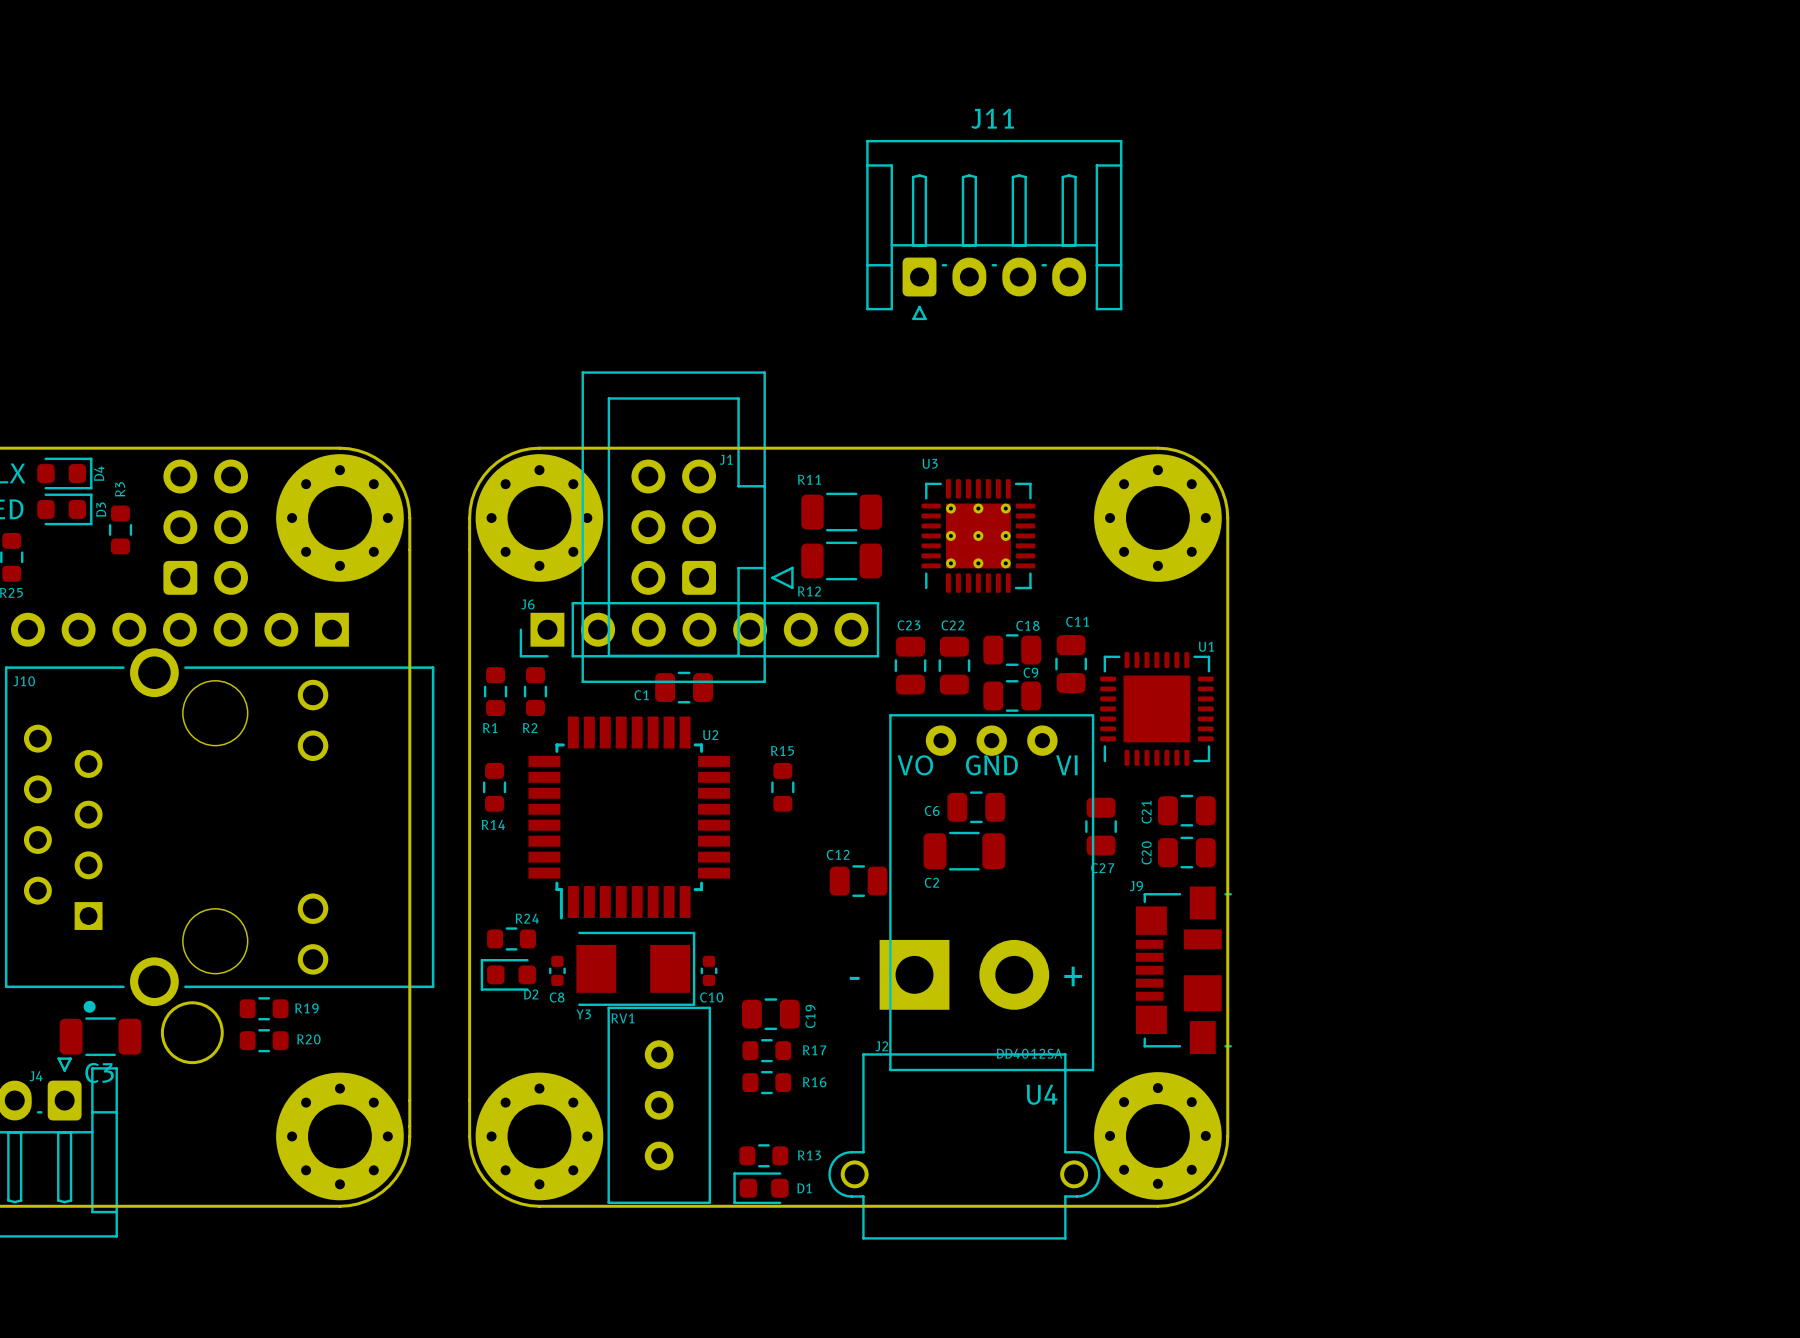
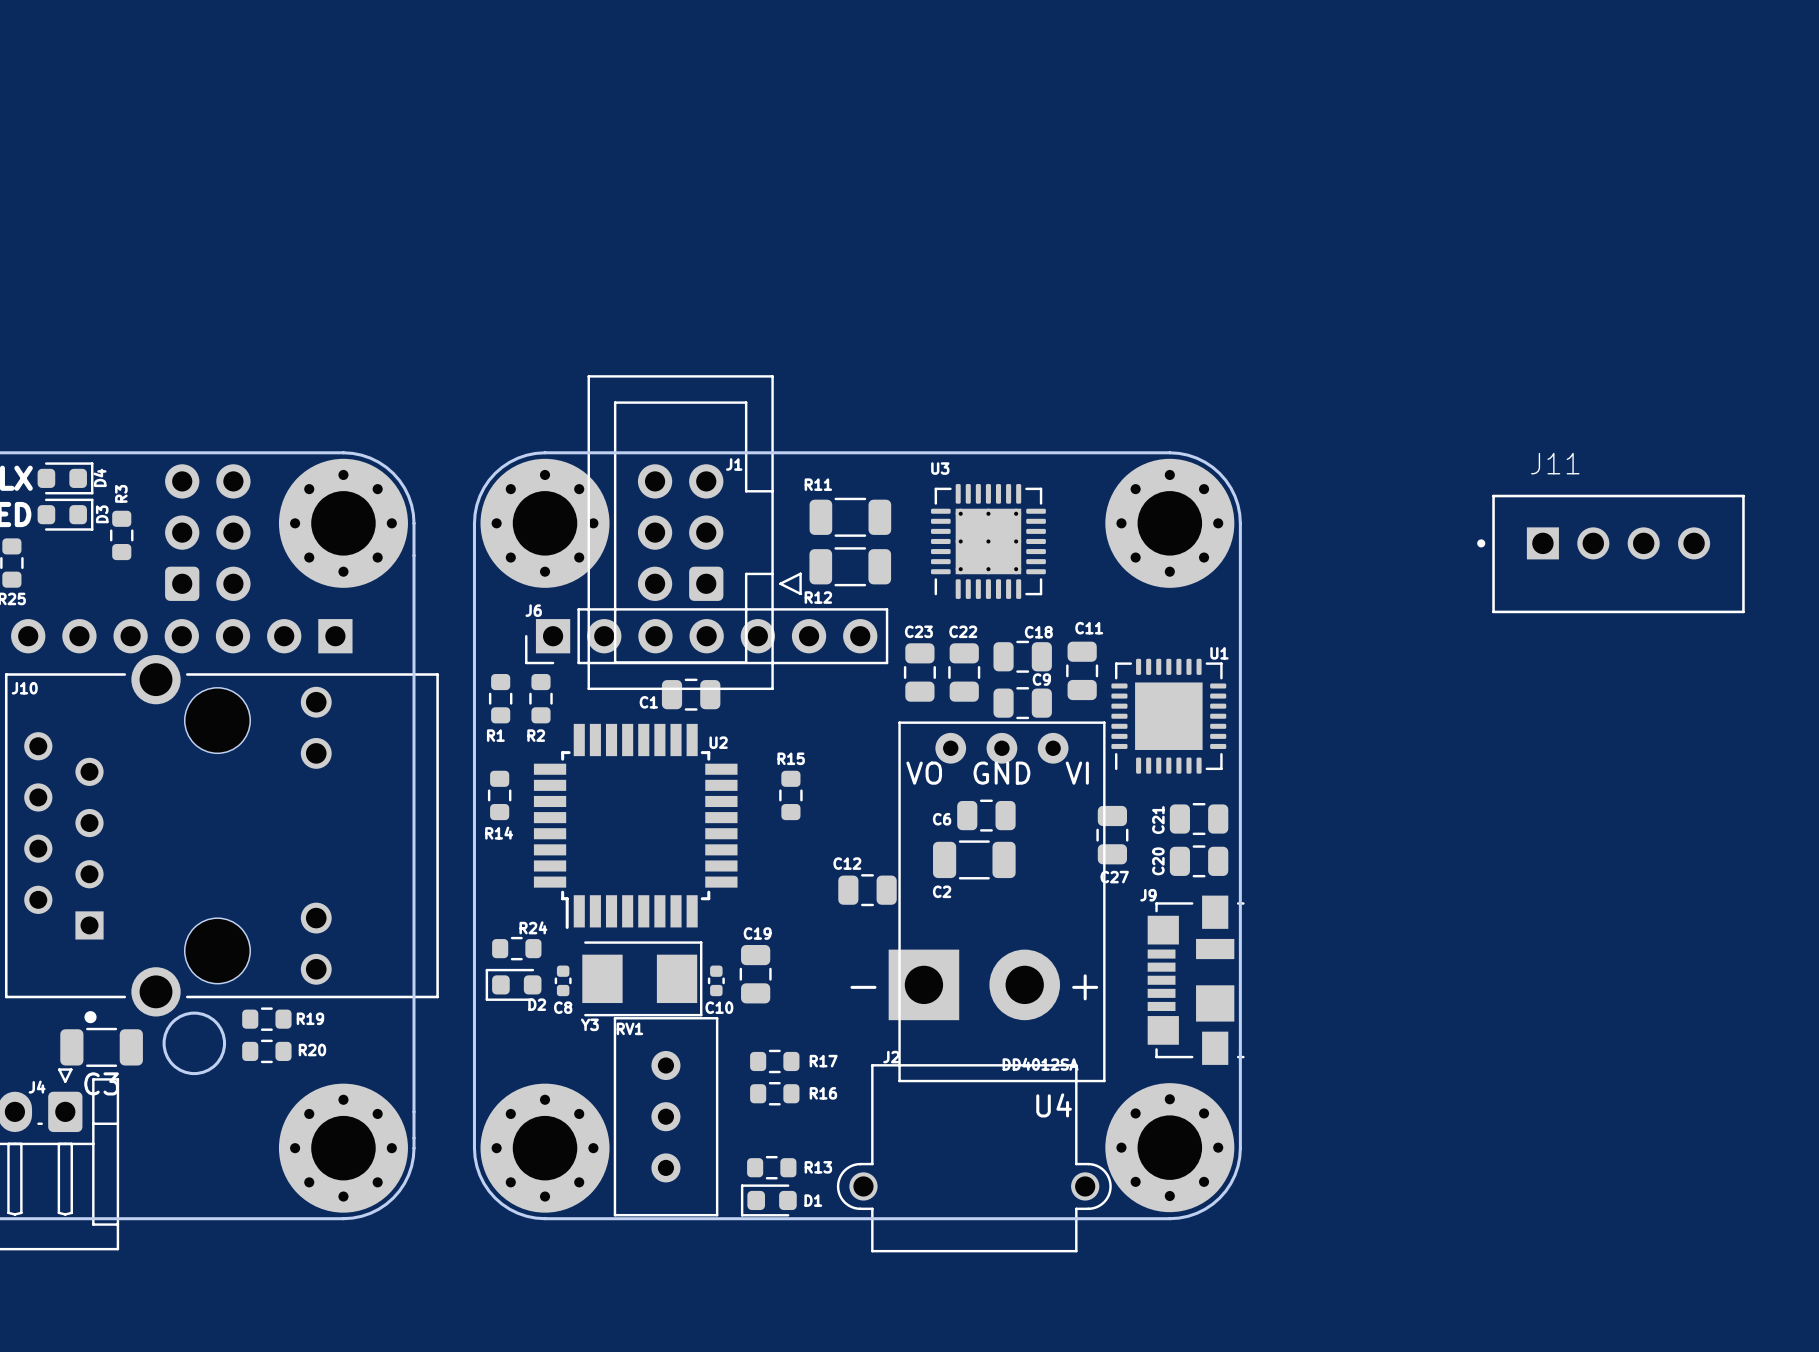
J11 name position: J11 (992, 118) -> J11 (1555, 463)
J11 footprint: [866, 139, 1123, 321] -> [1477, 494, 1745, 614]
C19 rotation: 0° (770, 1014) -> 90° clockwise (755, 974)
C19 position: (770, 1014) -> (755, 974)
C19 name position: C19 (810, 1016) -> C19 (757, 933)

